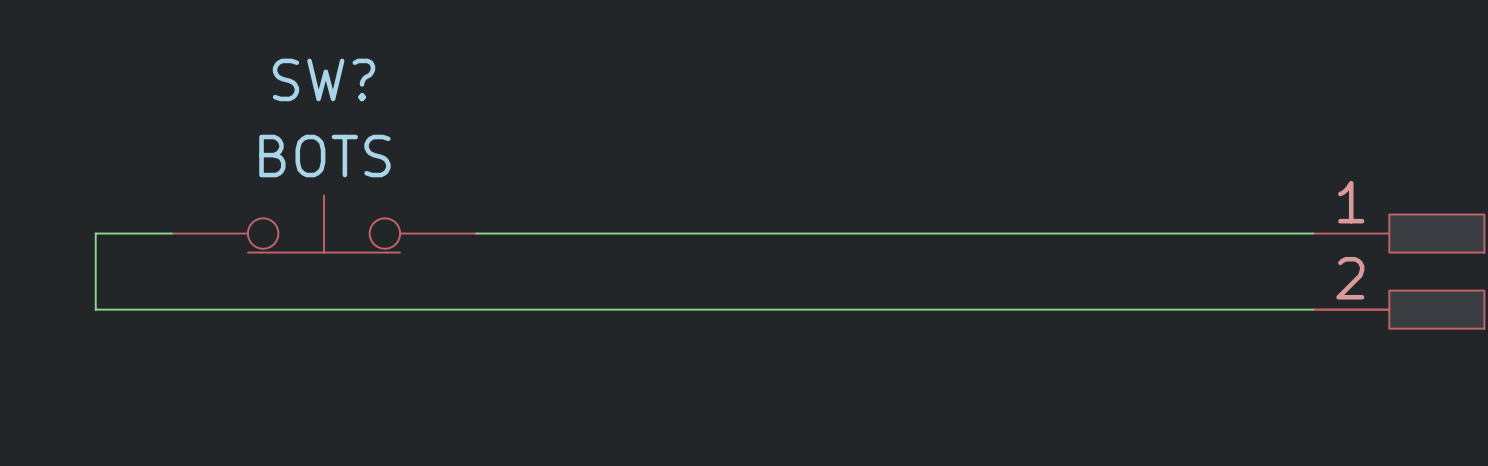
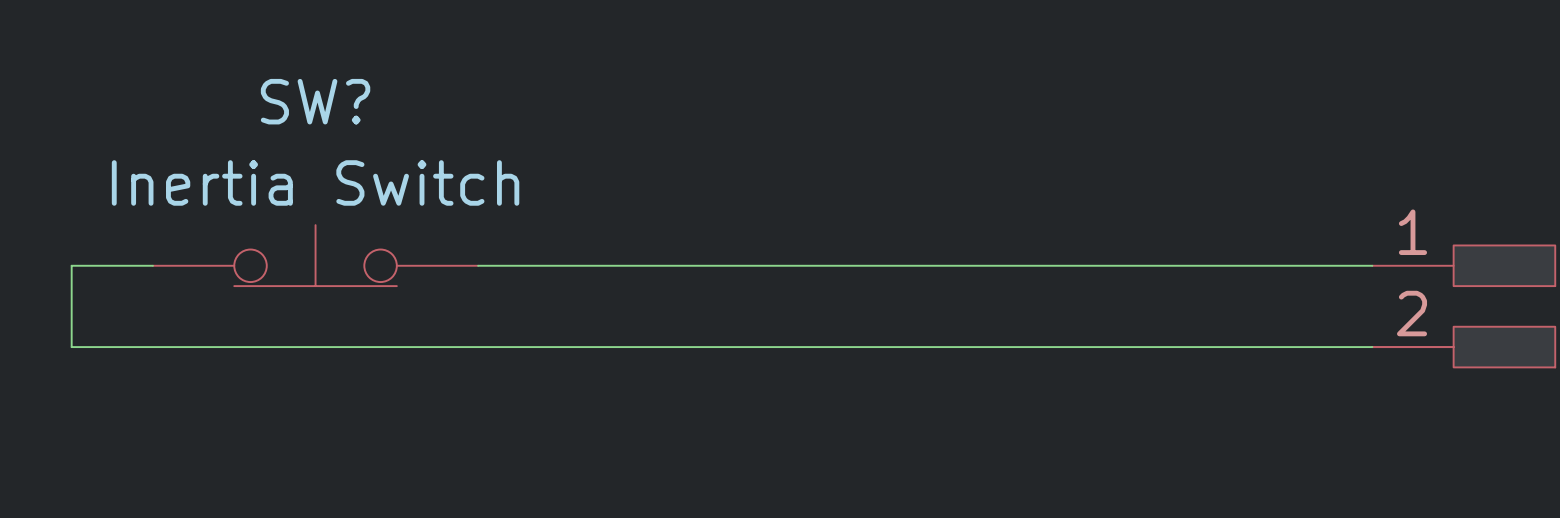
SW? value: BOTS (324, 156) -> Inertia Switch (315, 182)

